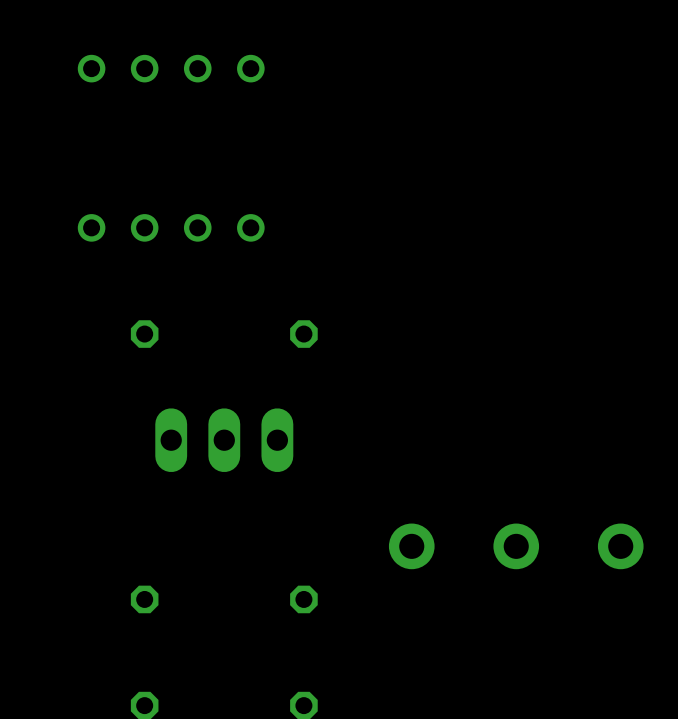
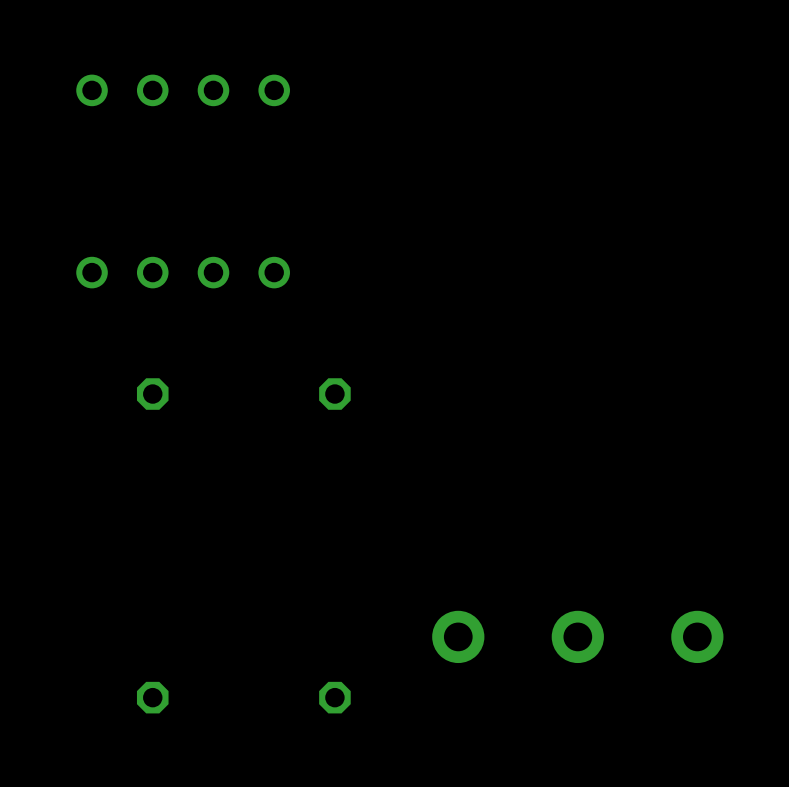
part: (224, 440) -> none

